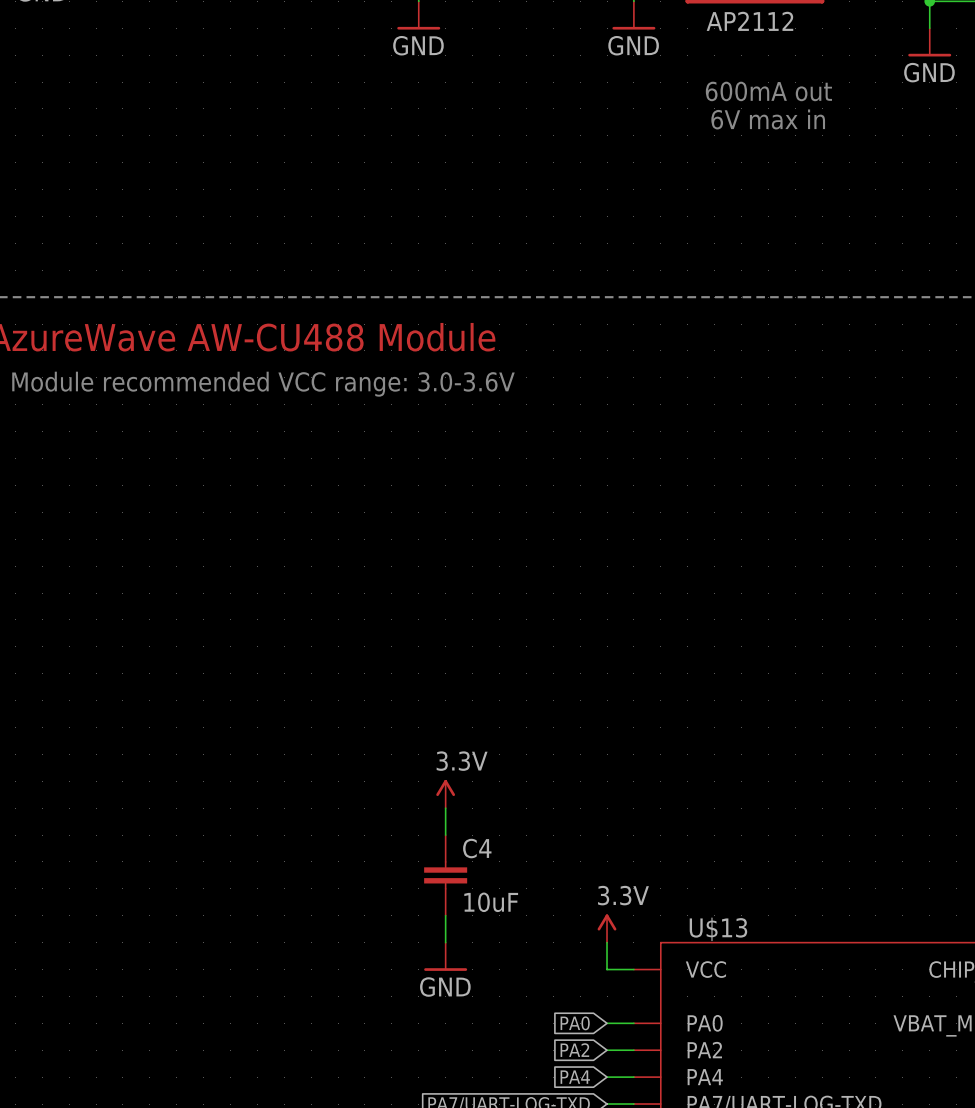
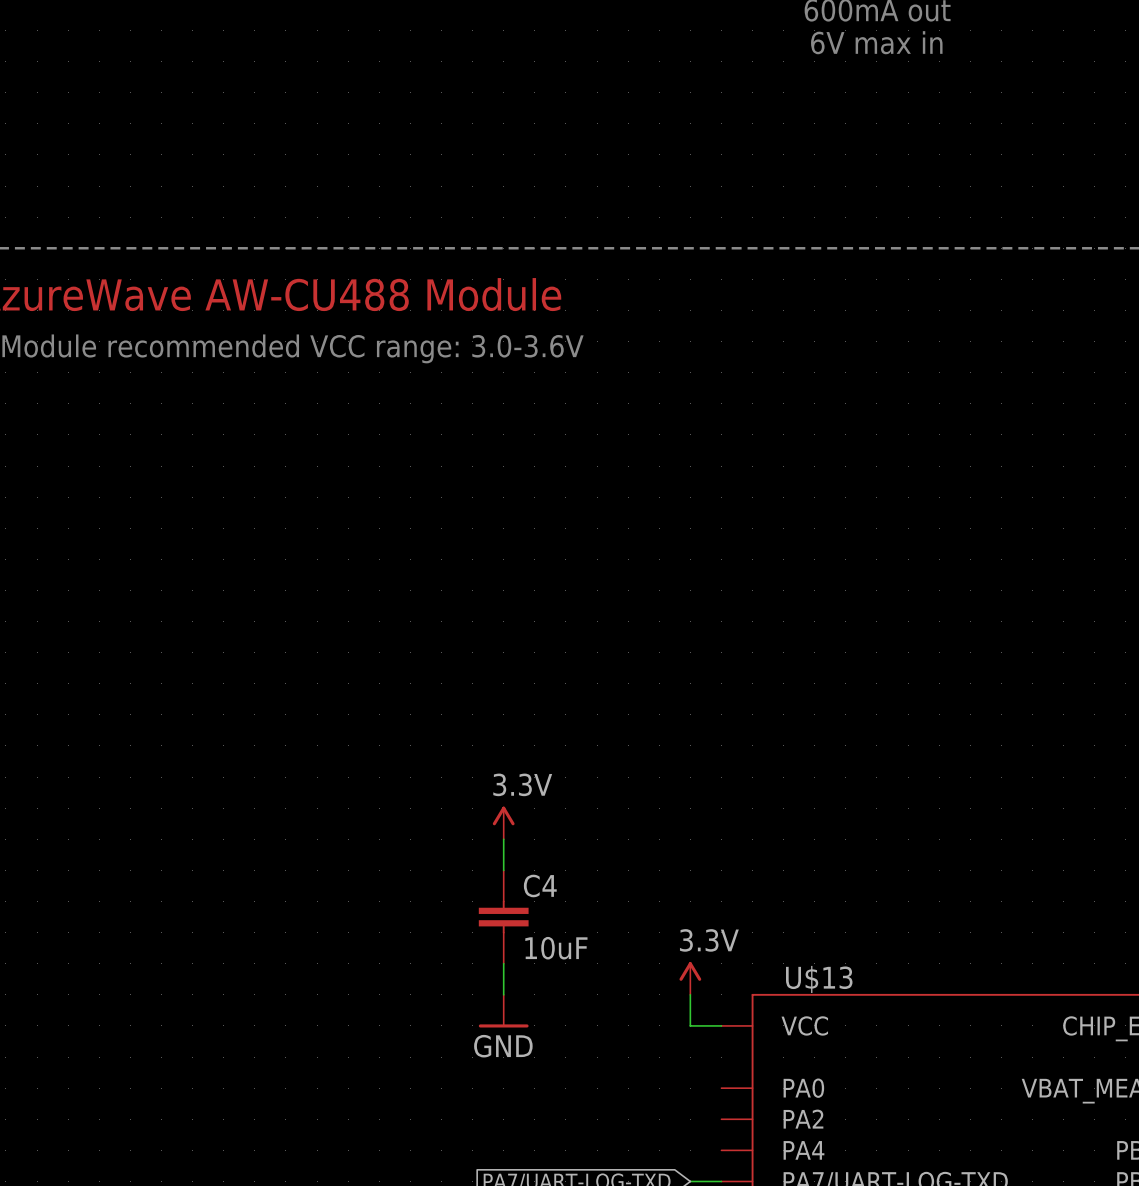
global label: PA0 (575, 1023) -> none
wire: (607, 1023) (633, 1023) -> none
global label: PA2 (574, 1050) -> none
wire: (607, 1050) (633, 1050) -> none
global label: PA4 (575, 1077) -> none
wire: (607, 1077) (633, 1077) -> none

